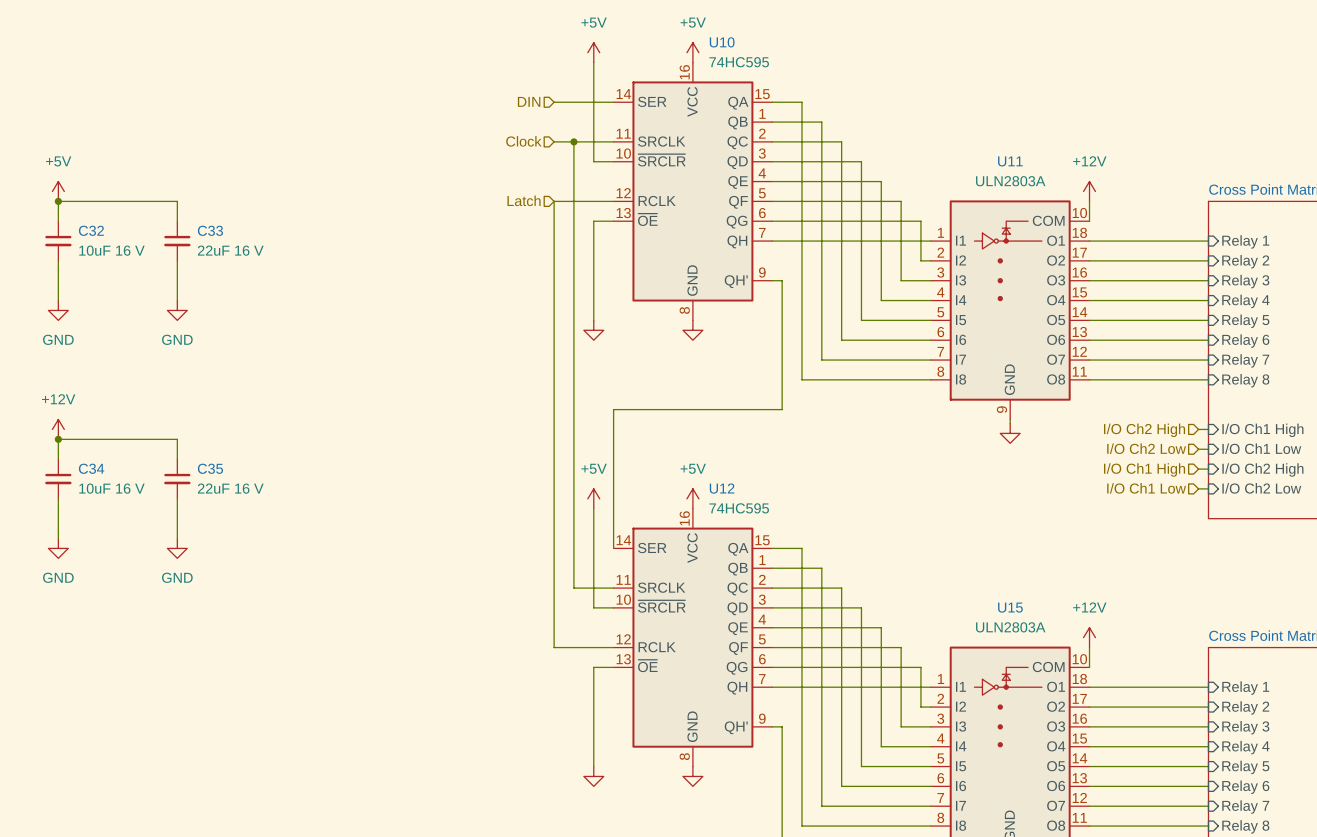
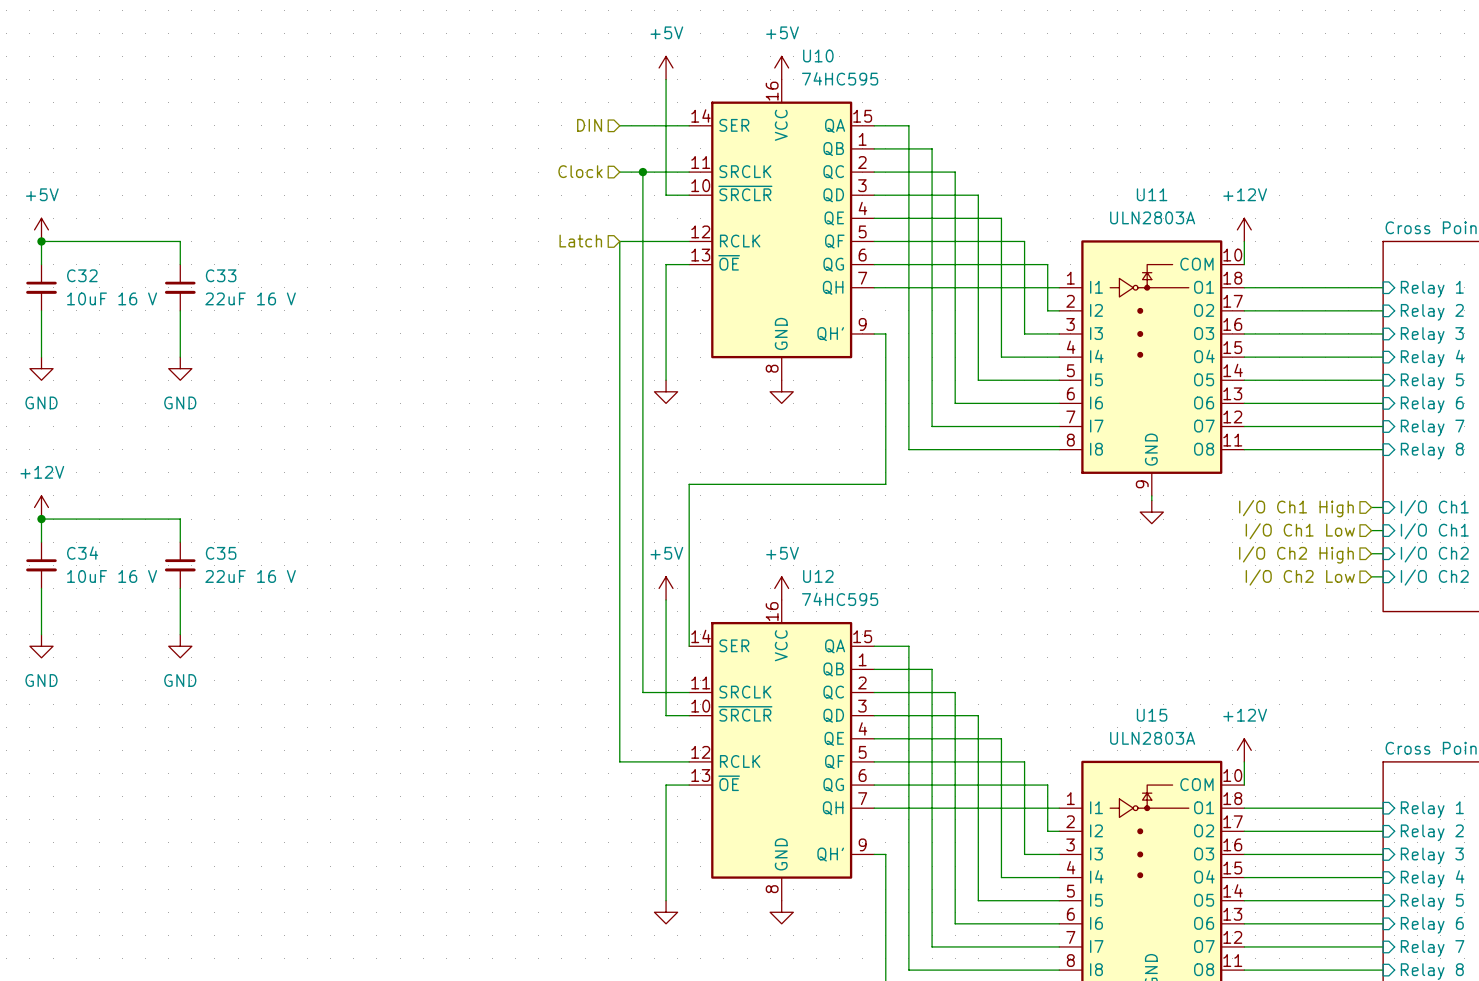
hierarchical label: I/O Ch2 High (1144, 430) -> I/O Ch1 High (1296, 508)
hierarchical label: I/O Ch2 Low (1146, 448) -> I/O Ch1 Low (1300, 531)
hierarchical label: I/O Ch1 High (1144, 469) -> I/O Ch2 High (1296, 554)
hierarchical label: I/O Ch1 Low (1146, 488) -> I/O Ch2 Low (1300, 577)

